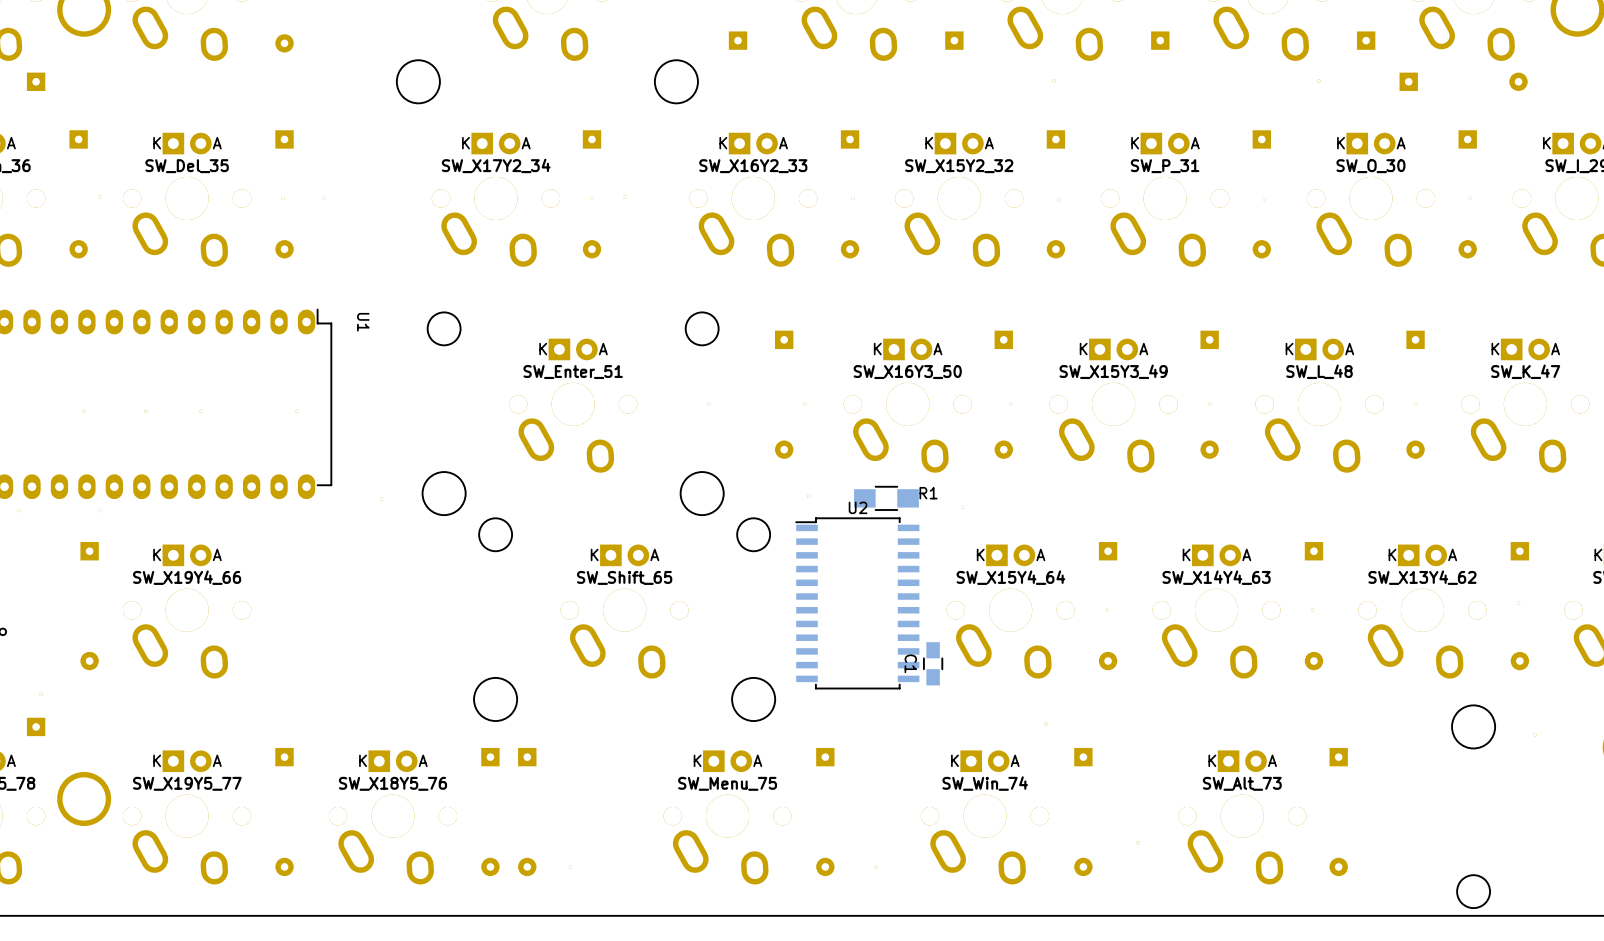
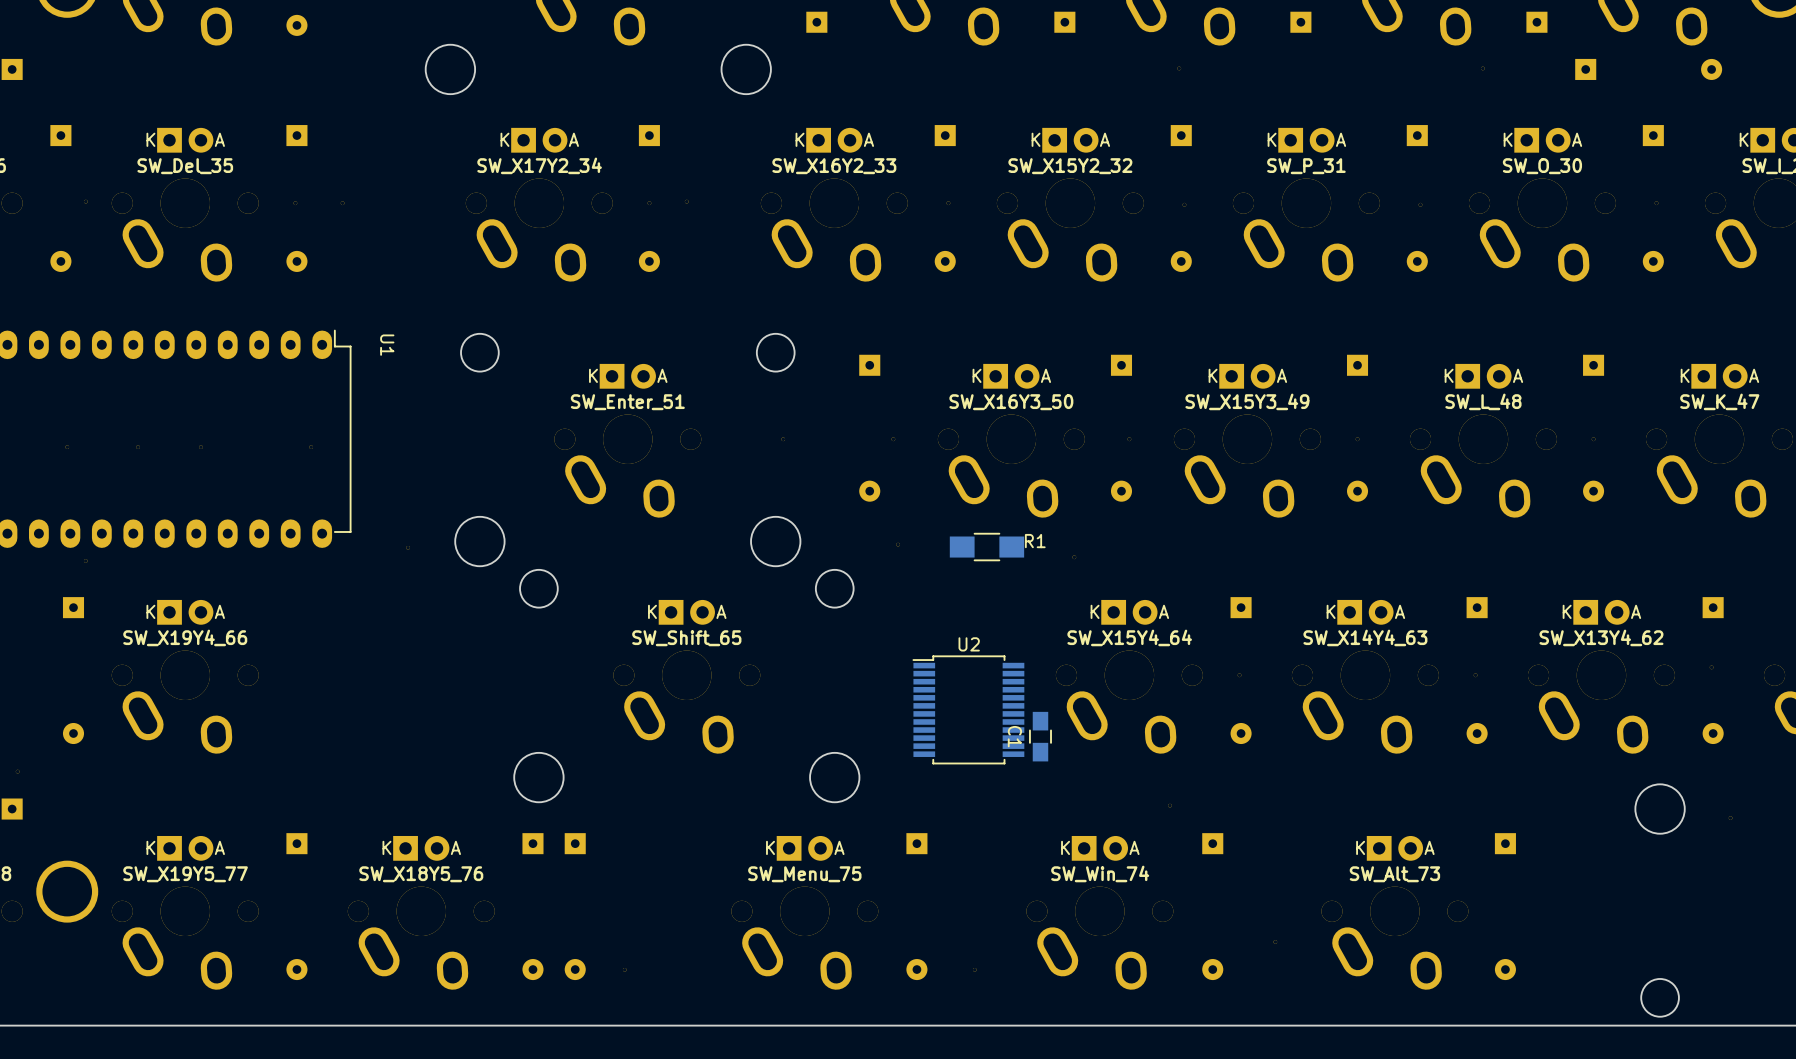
U2 name position: U2 (858, 507) -> U2 (969, 644)
U2 footprint: [795, 517, 920, 690] -> [912, 655, 1025, 765]

